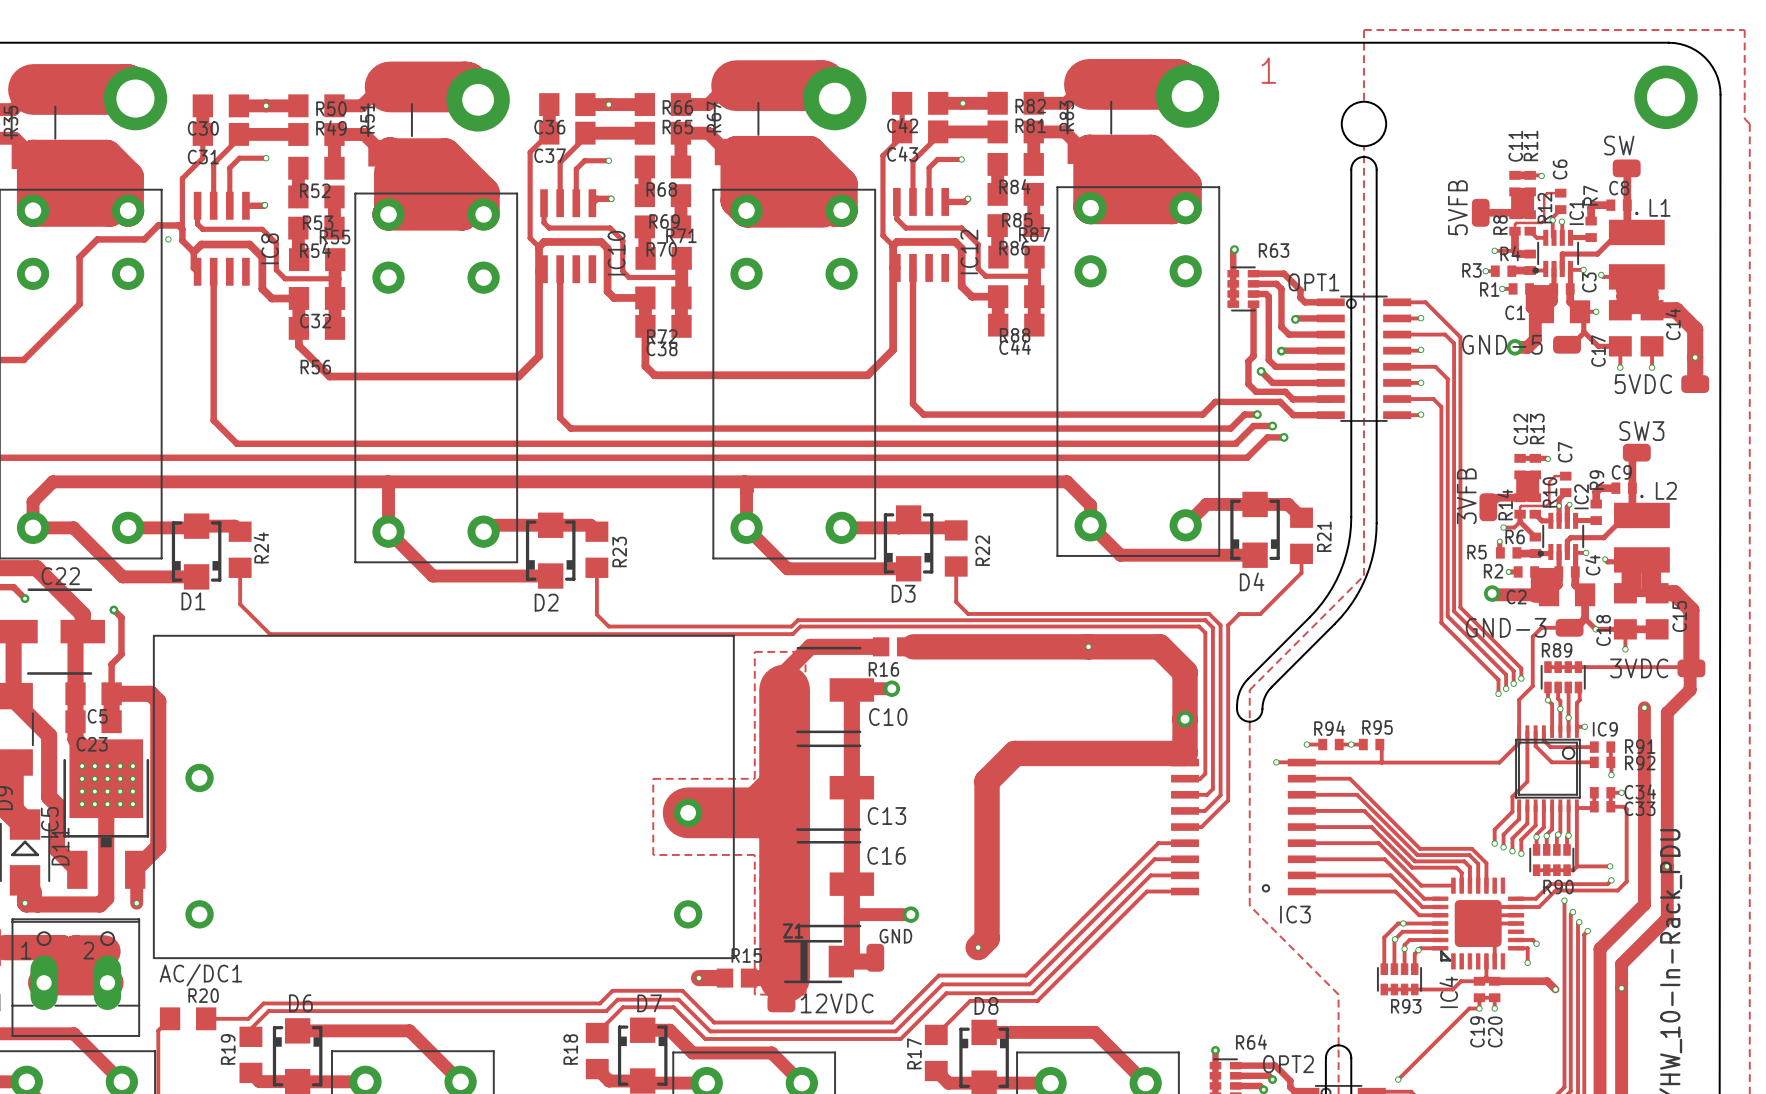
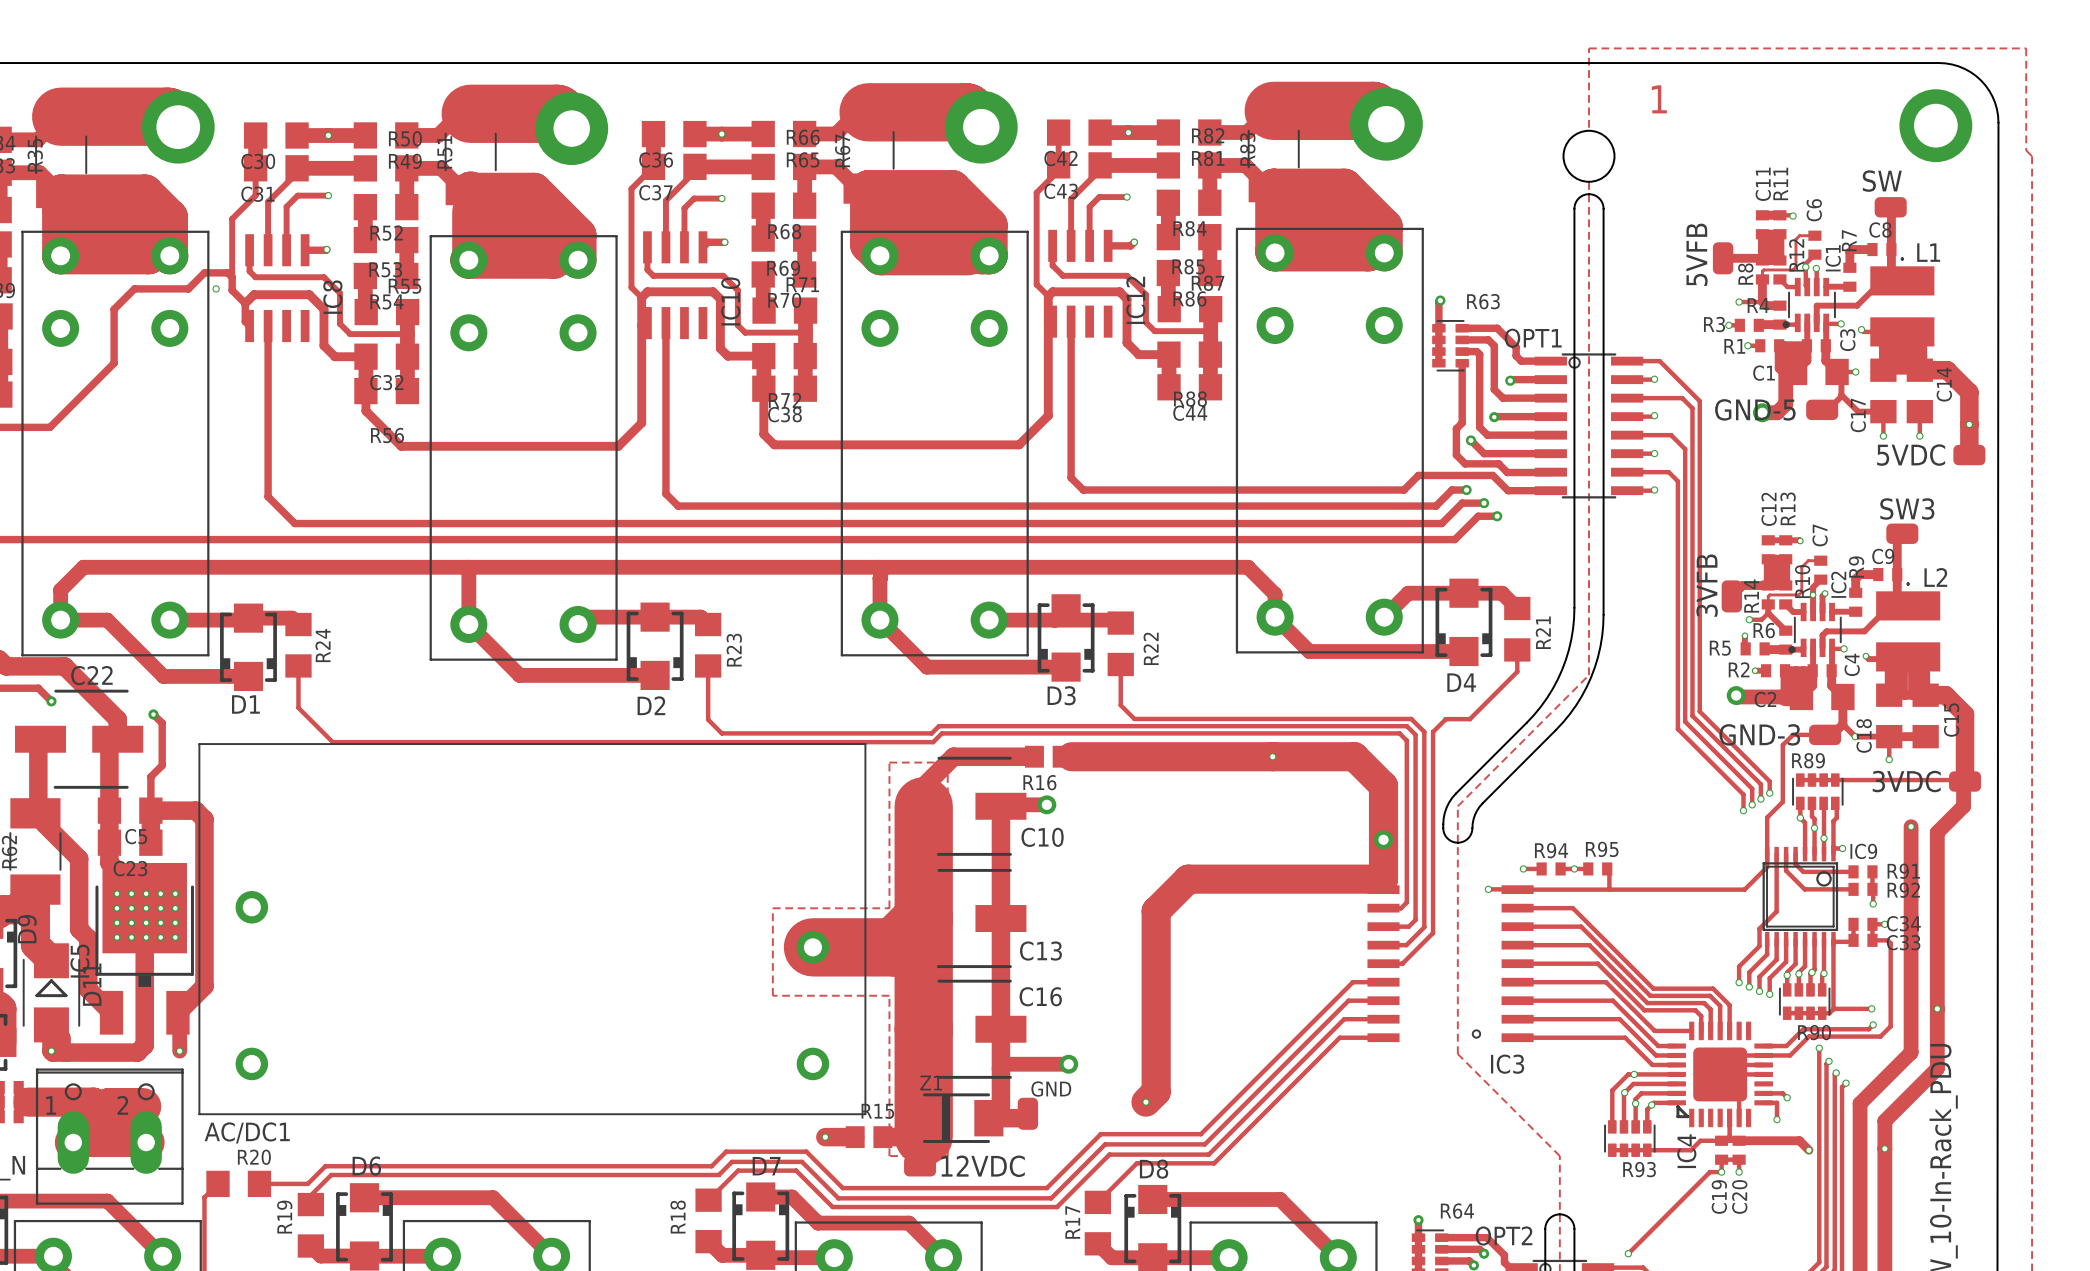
drawing position: (1268, 70) -> (1659, 99)

